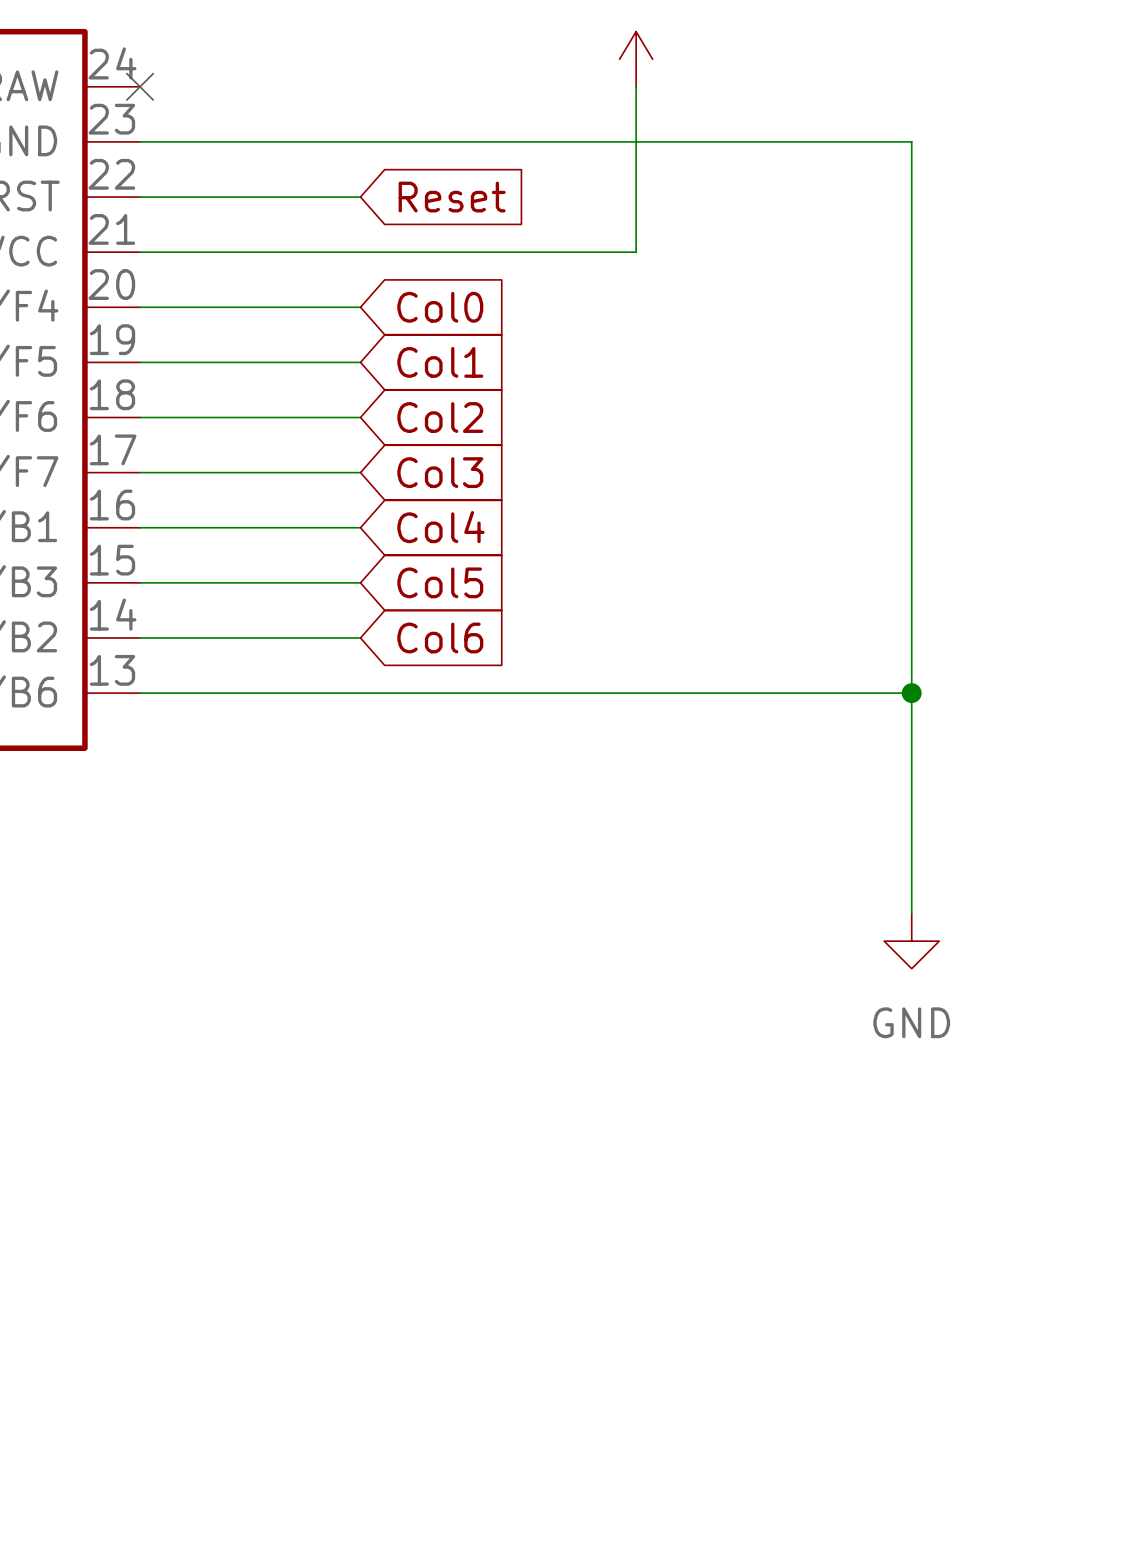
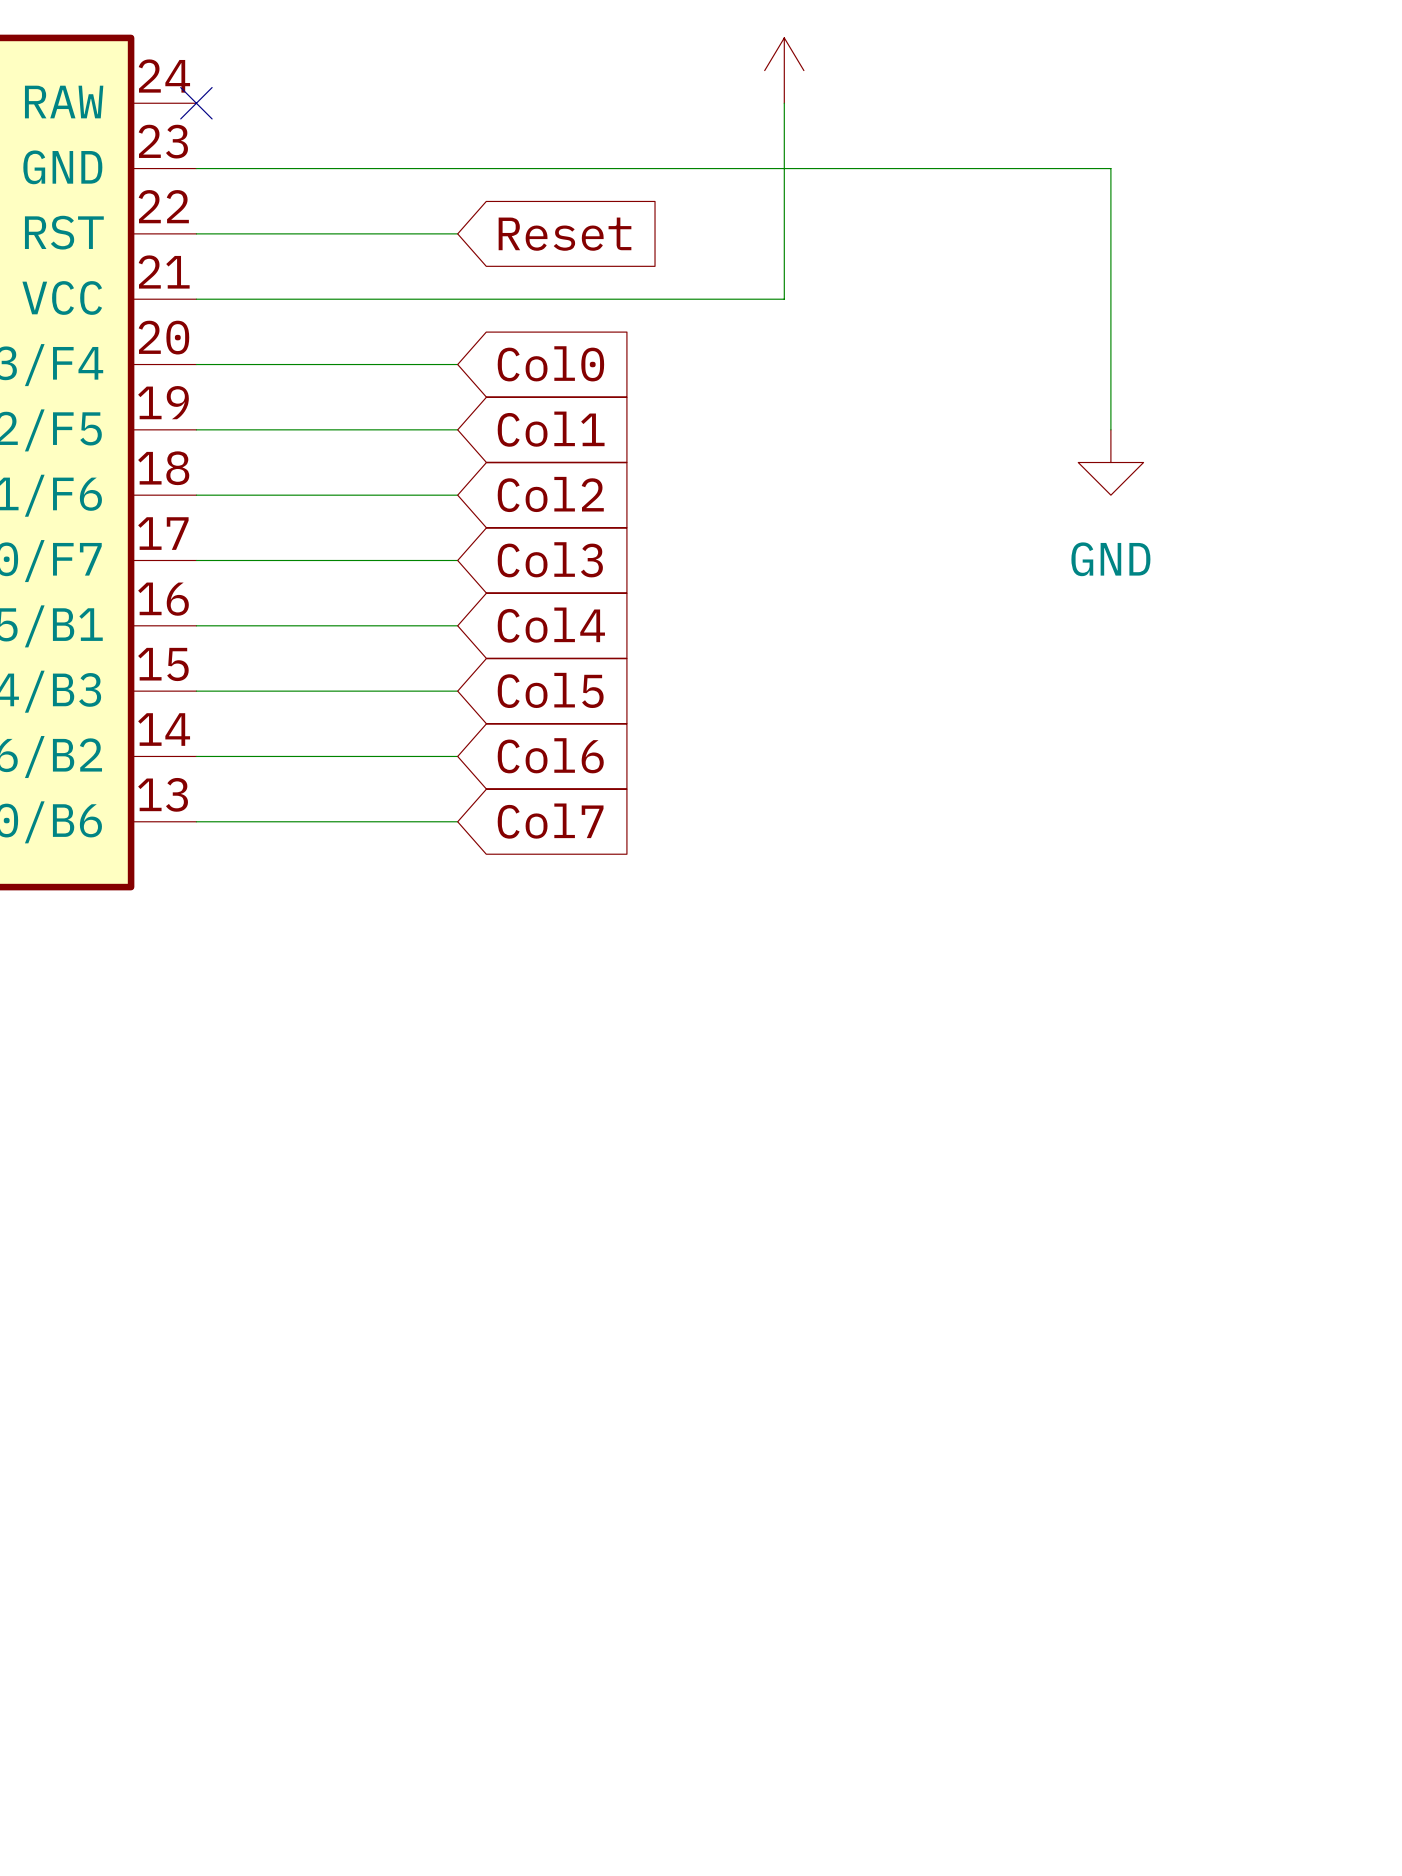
wire: (911, 362) (911, 913) -> none
power symbol: none -> GND (1110, 462)
wire: (360, 693) (911, 693) -> none
global label: none -> Col7 (550, 821)
junction: (911, 693) -> none
power symbol: GND (911, 941) -> none

